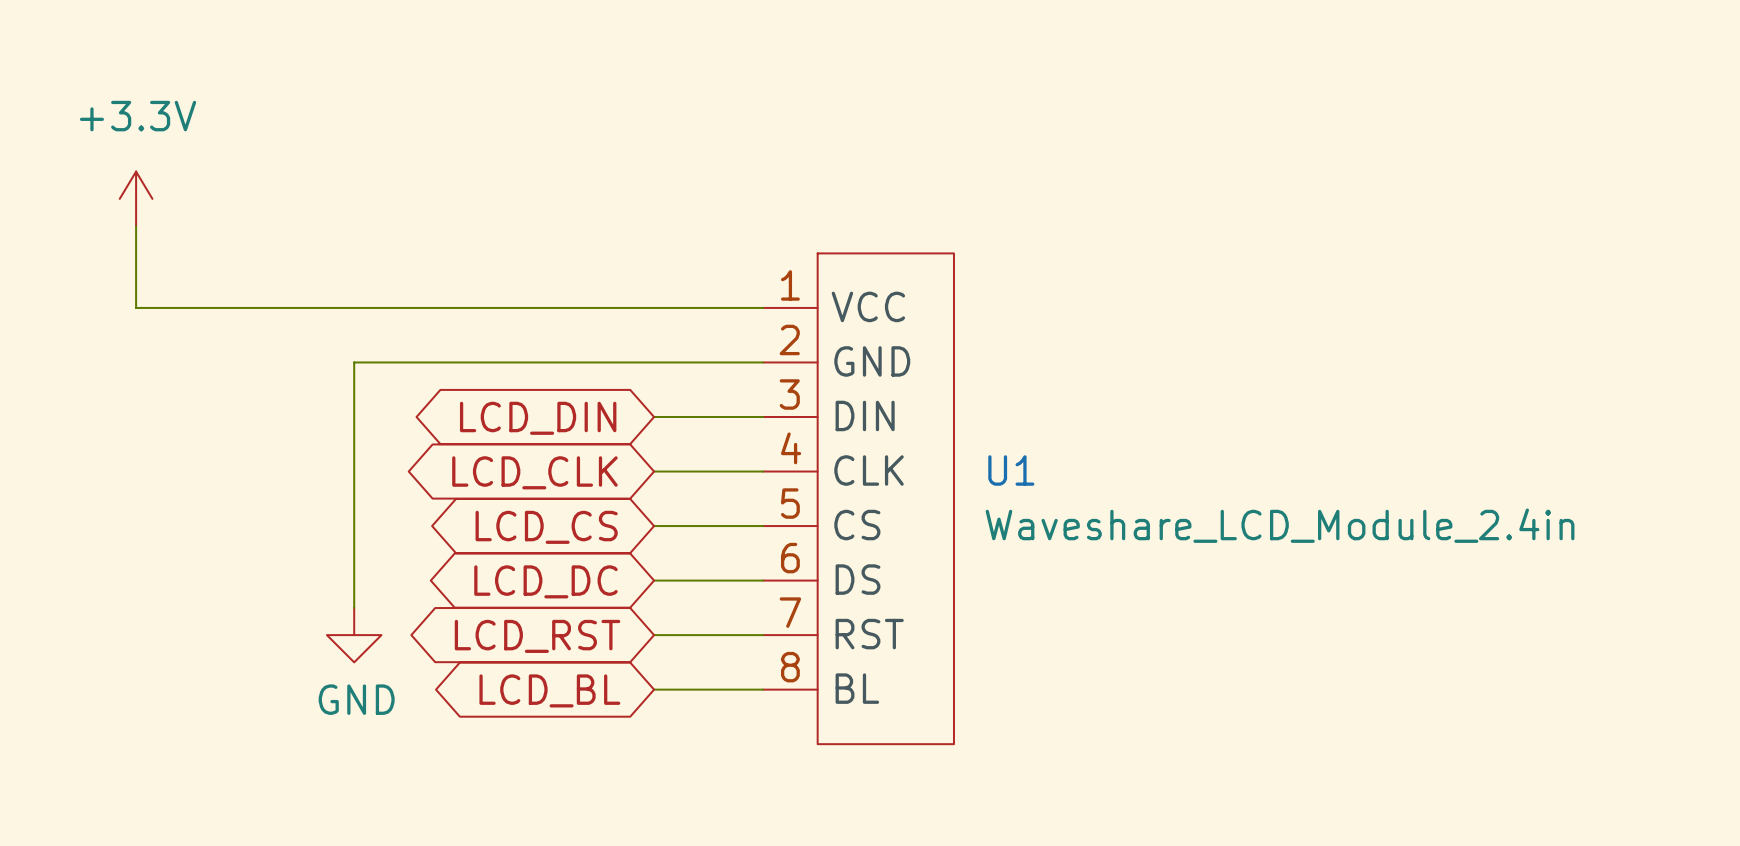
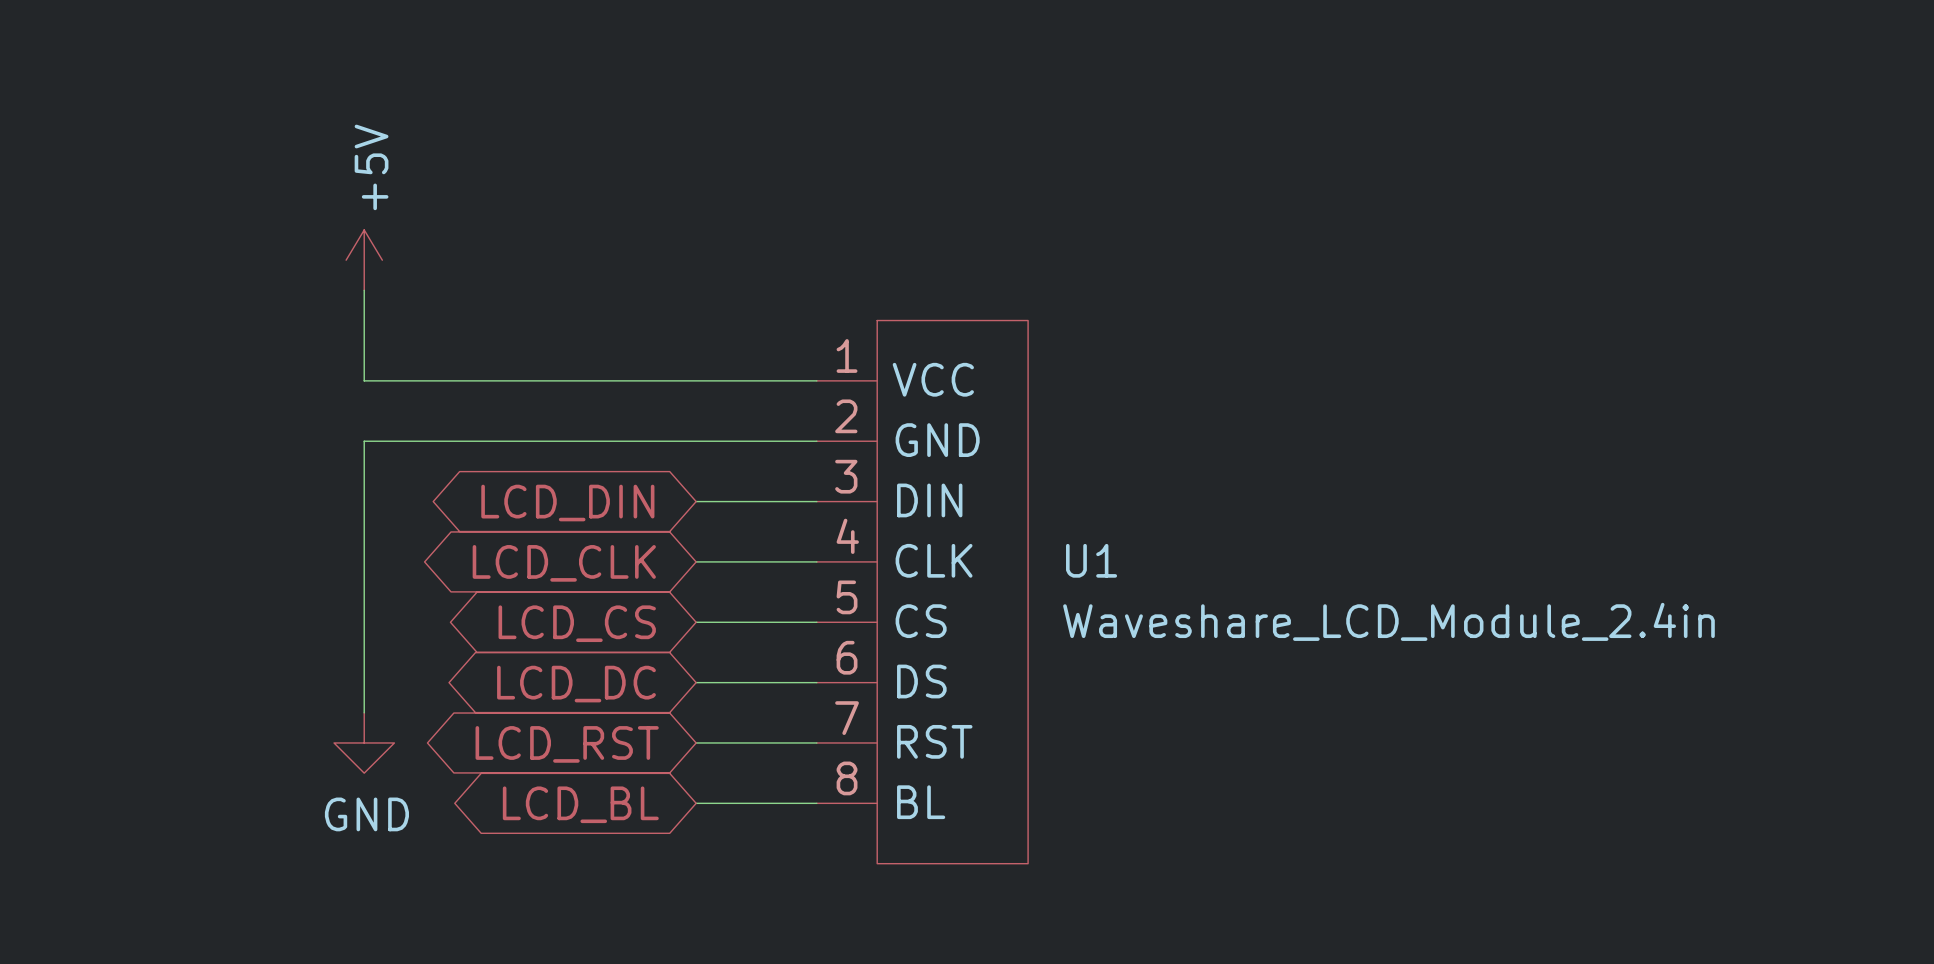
power symbol: +3.3V (136, 198) -> none
power symbol: none -> +5V (364, 260)
wire: (136, 226) (136, 307) (354, 307) -> (364, 290) (364, 380)

